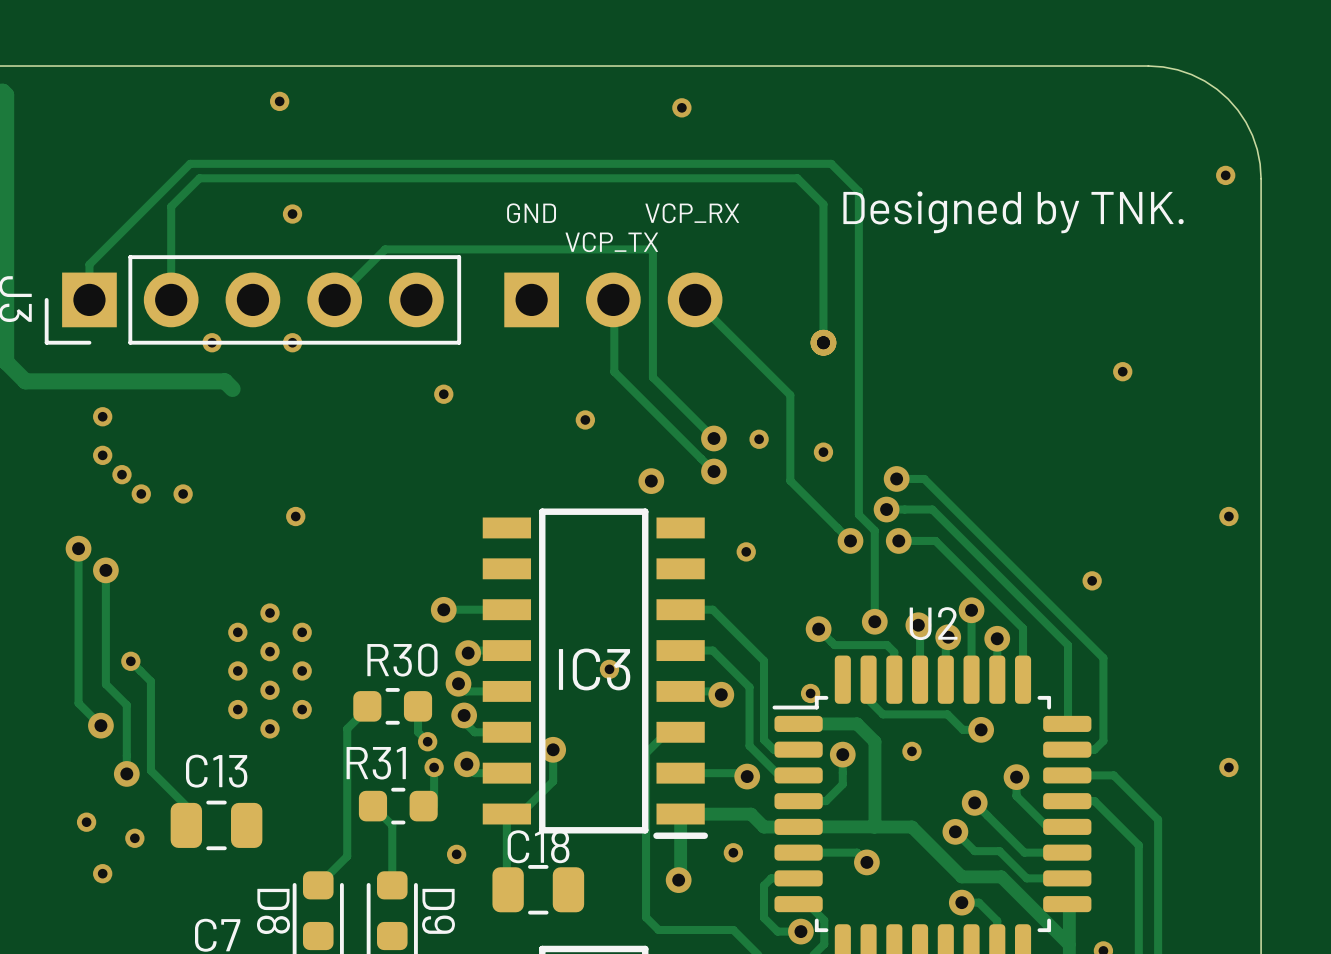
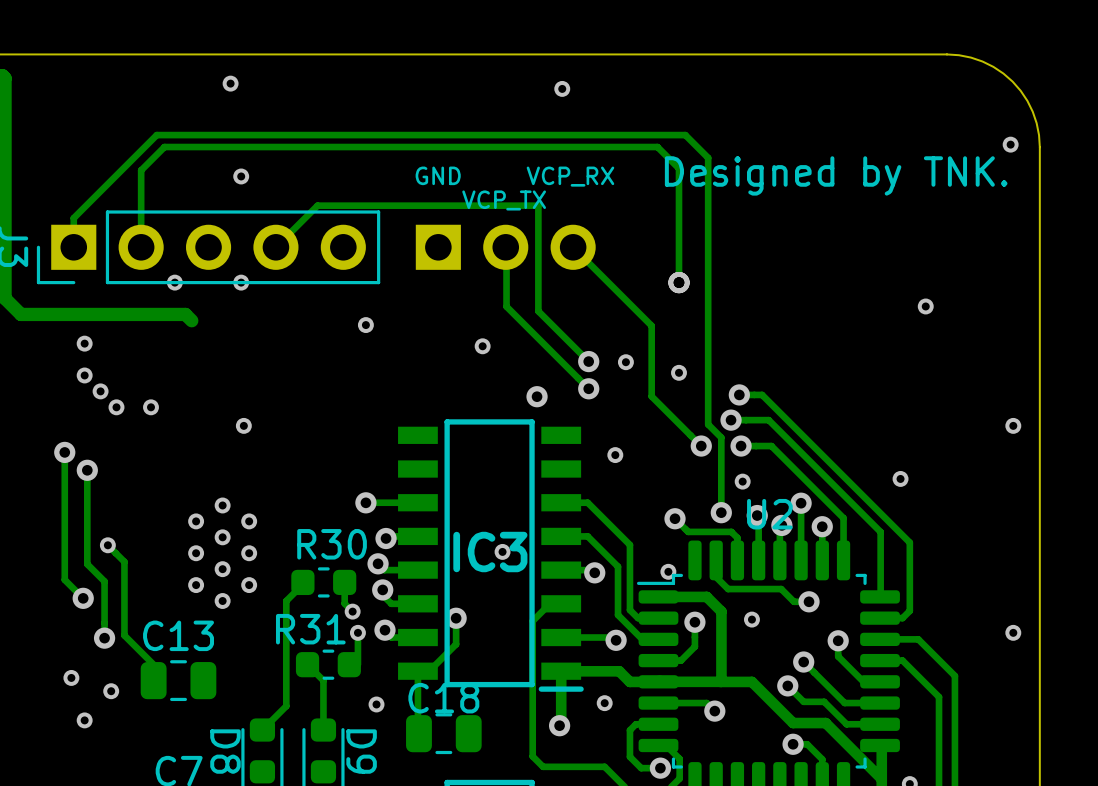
via: none -> (742, 481)

